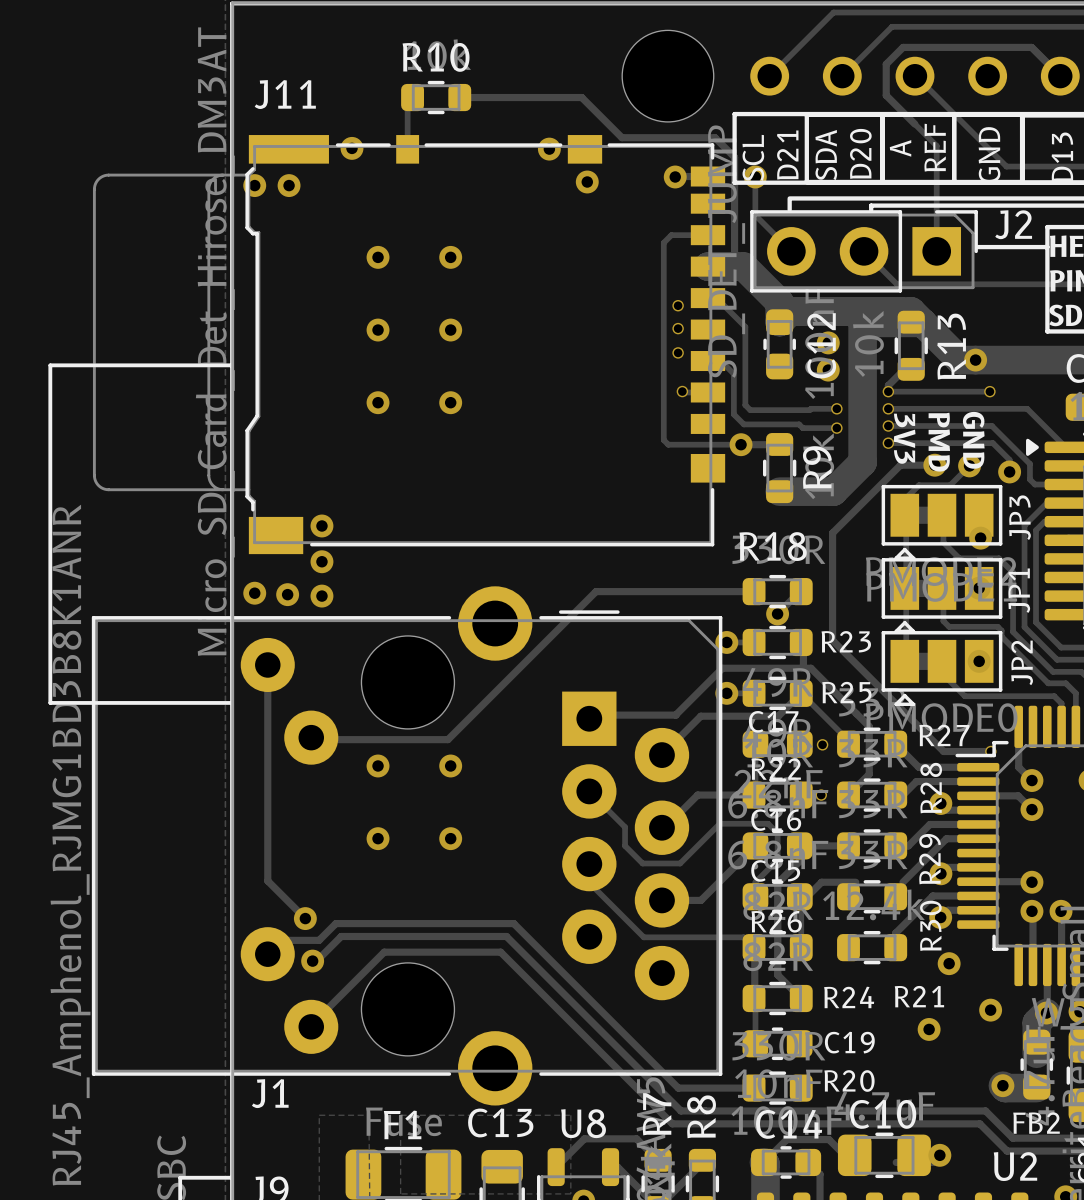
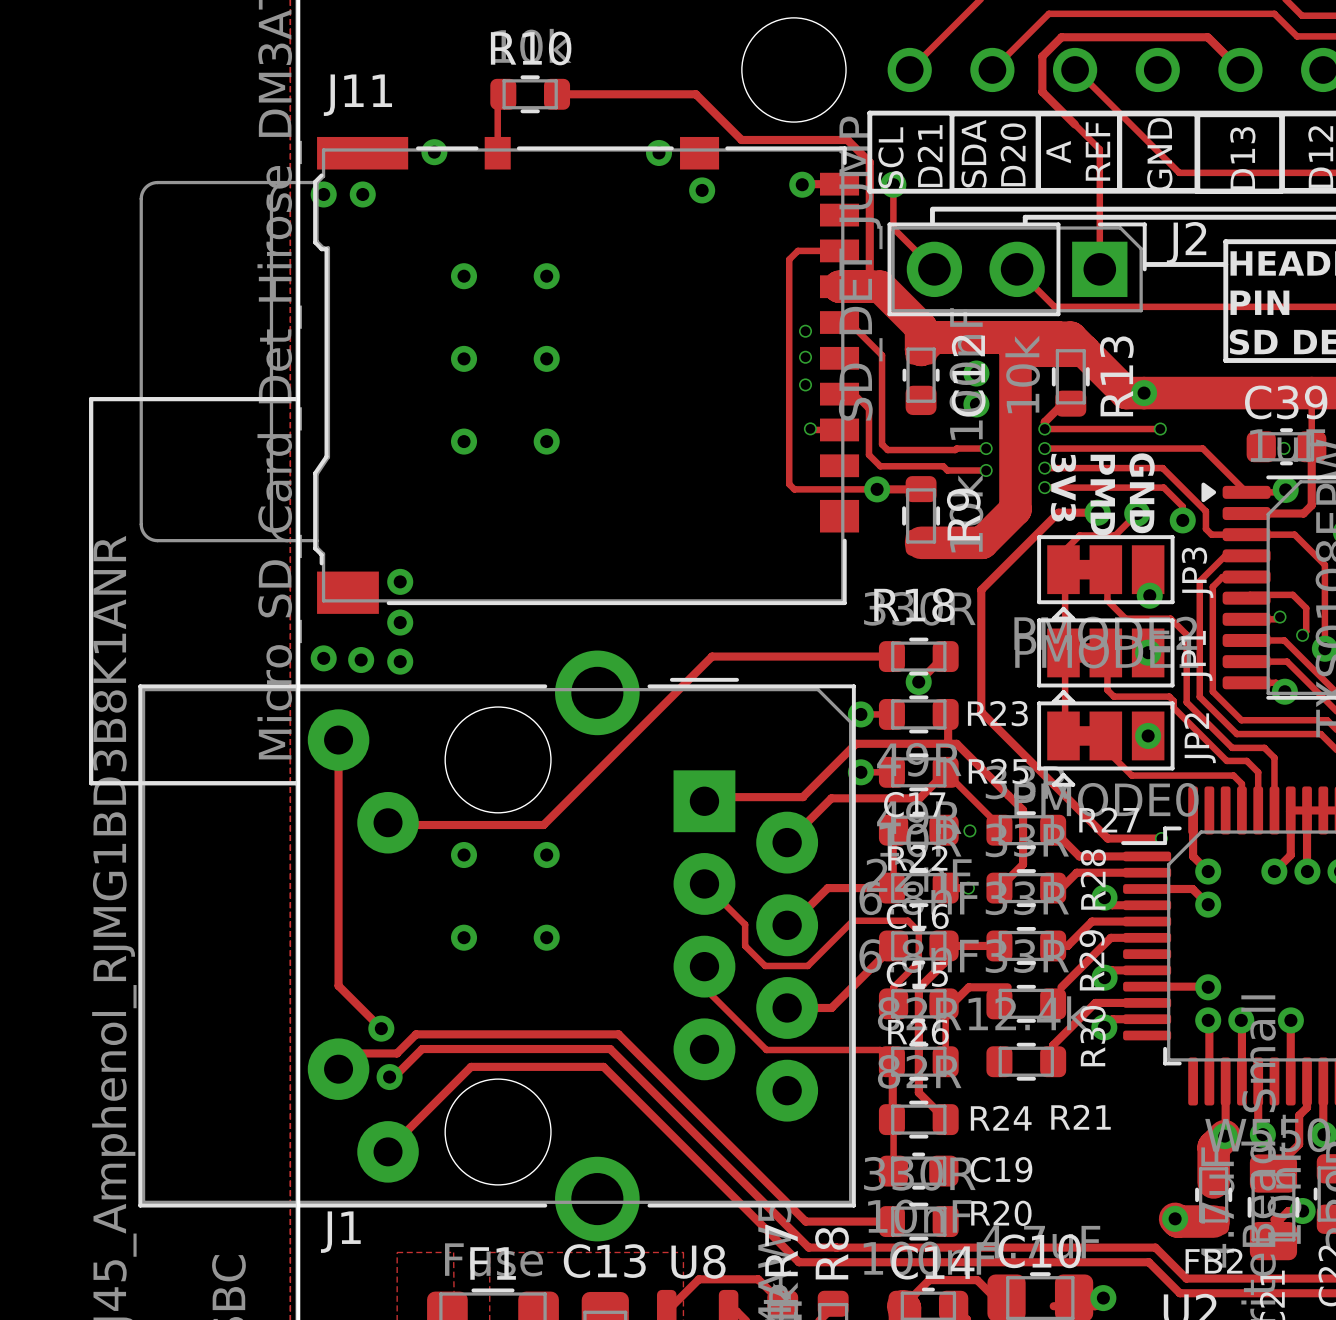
via: (949, 963) -> none
via: (990, 1010) -> none
via: (929, 1029) -> none

